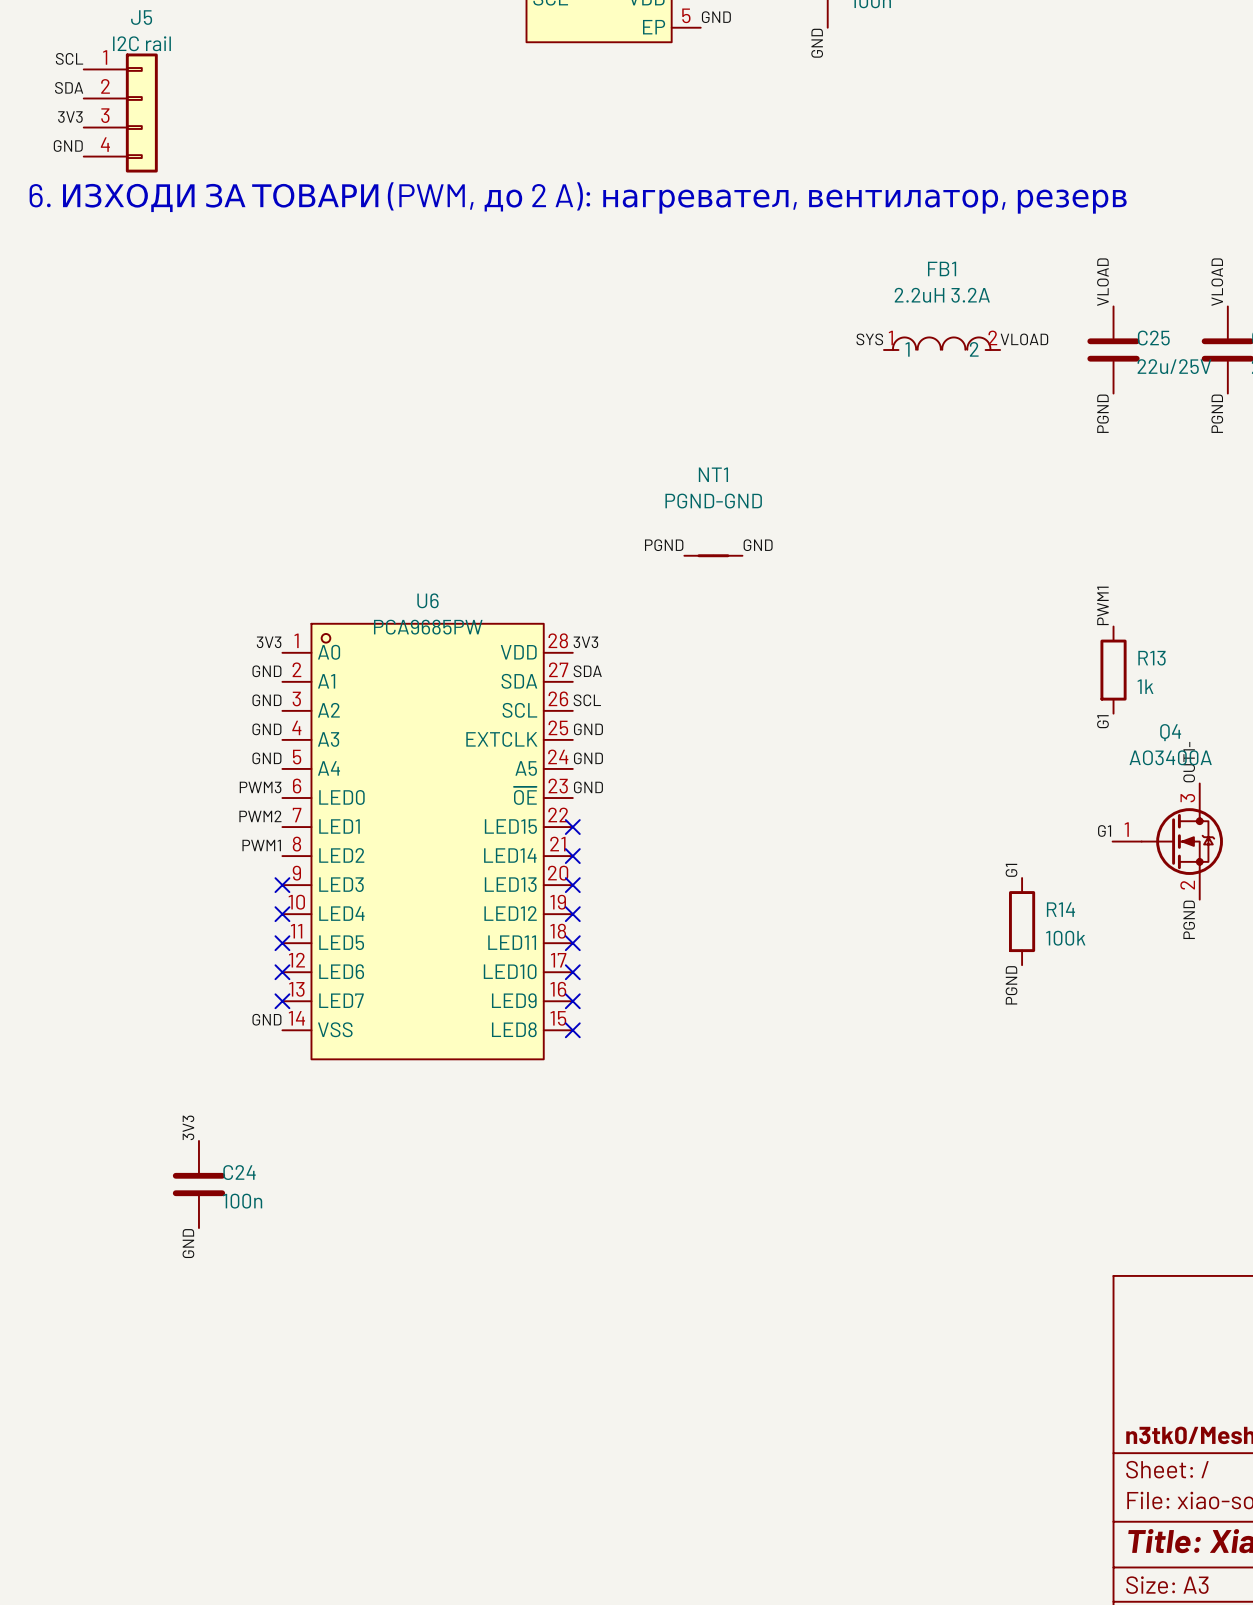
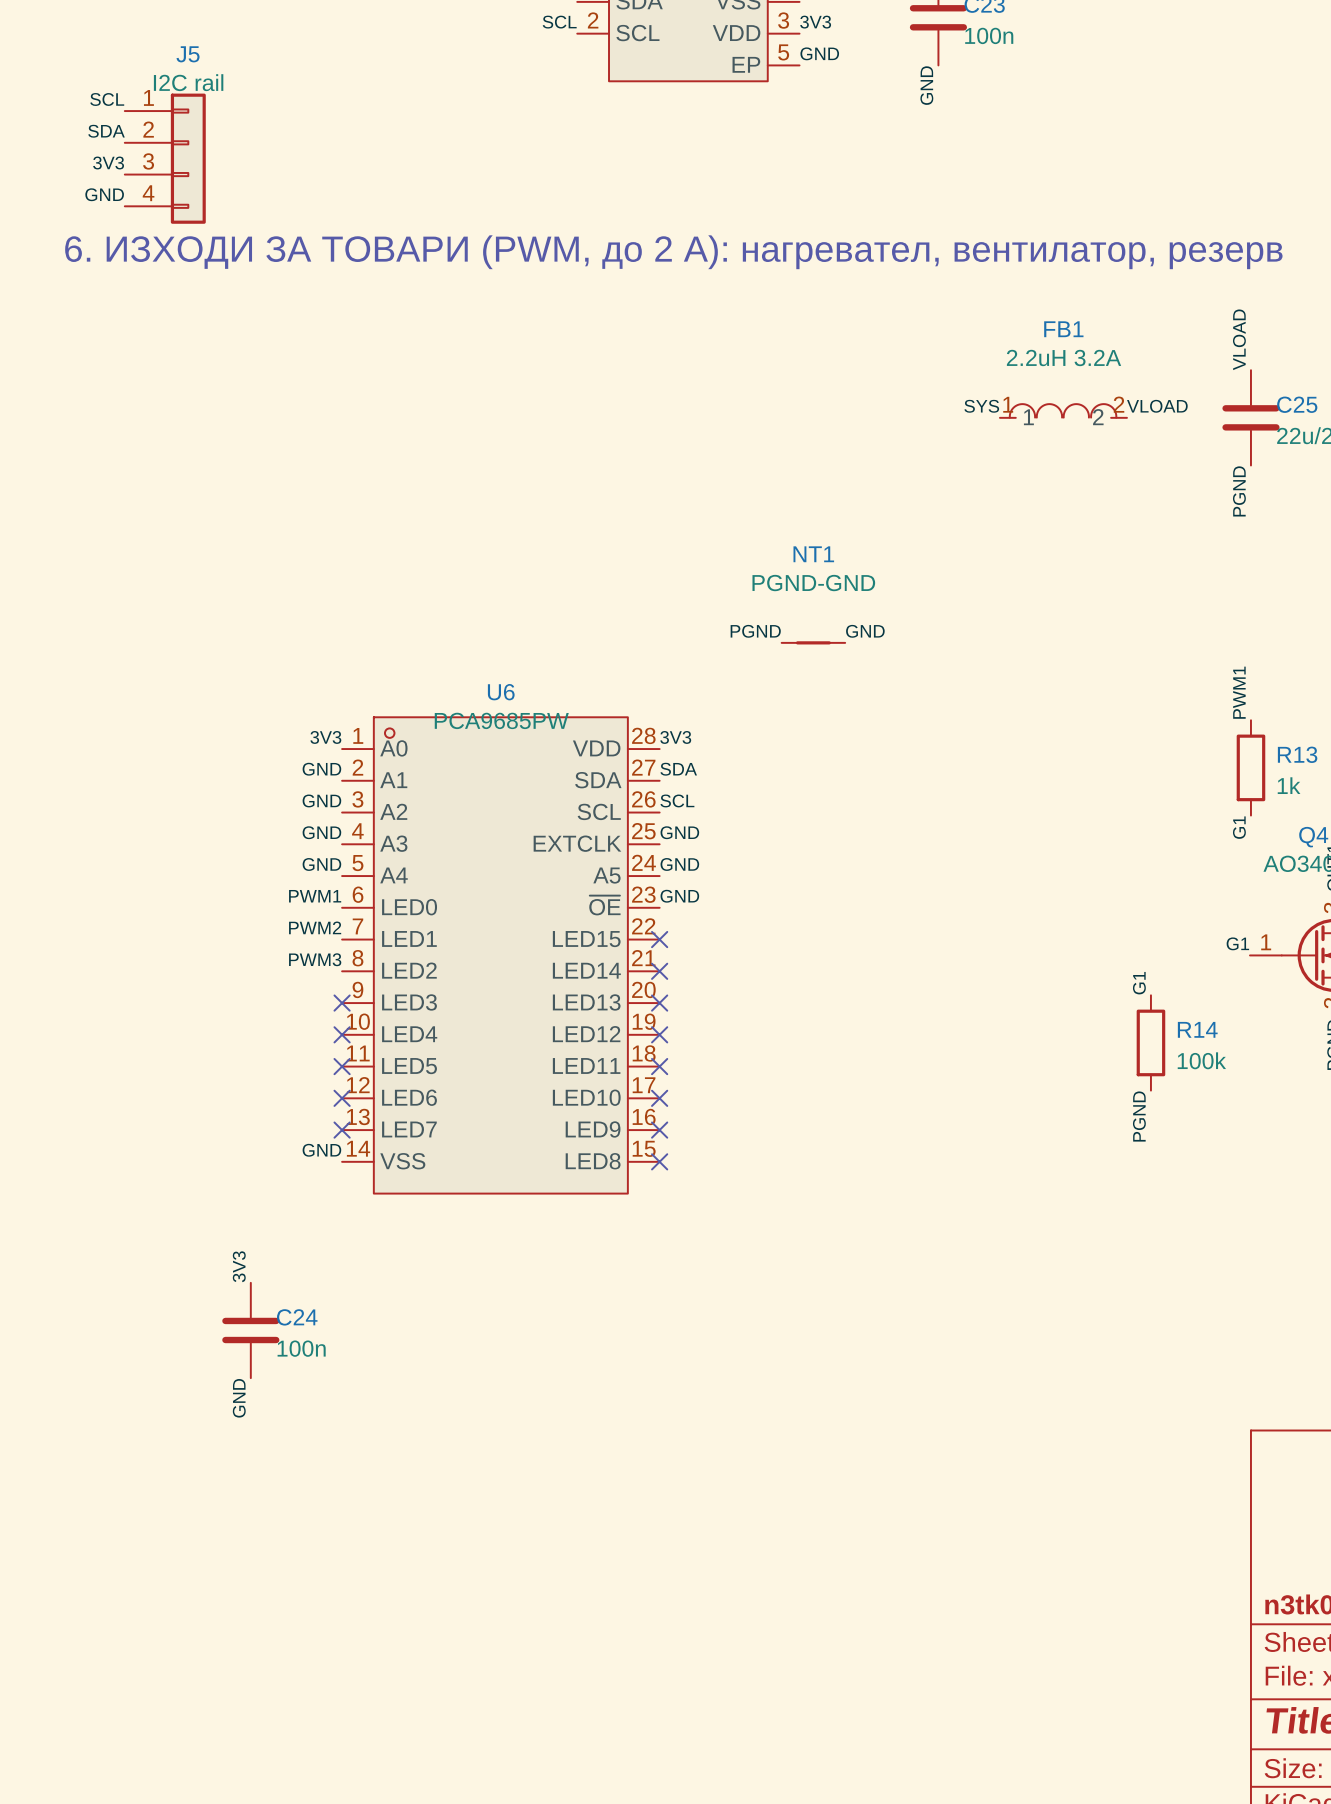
label: PWM3 (260, 787) -> PWM1 (315, 896)
label: PWM1 (261, 845) -> PWM3 (315, 959)

